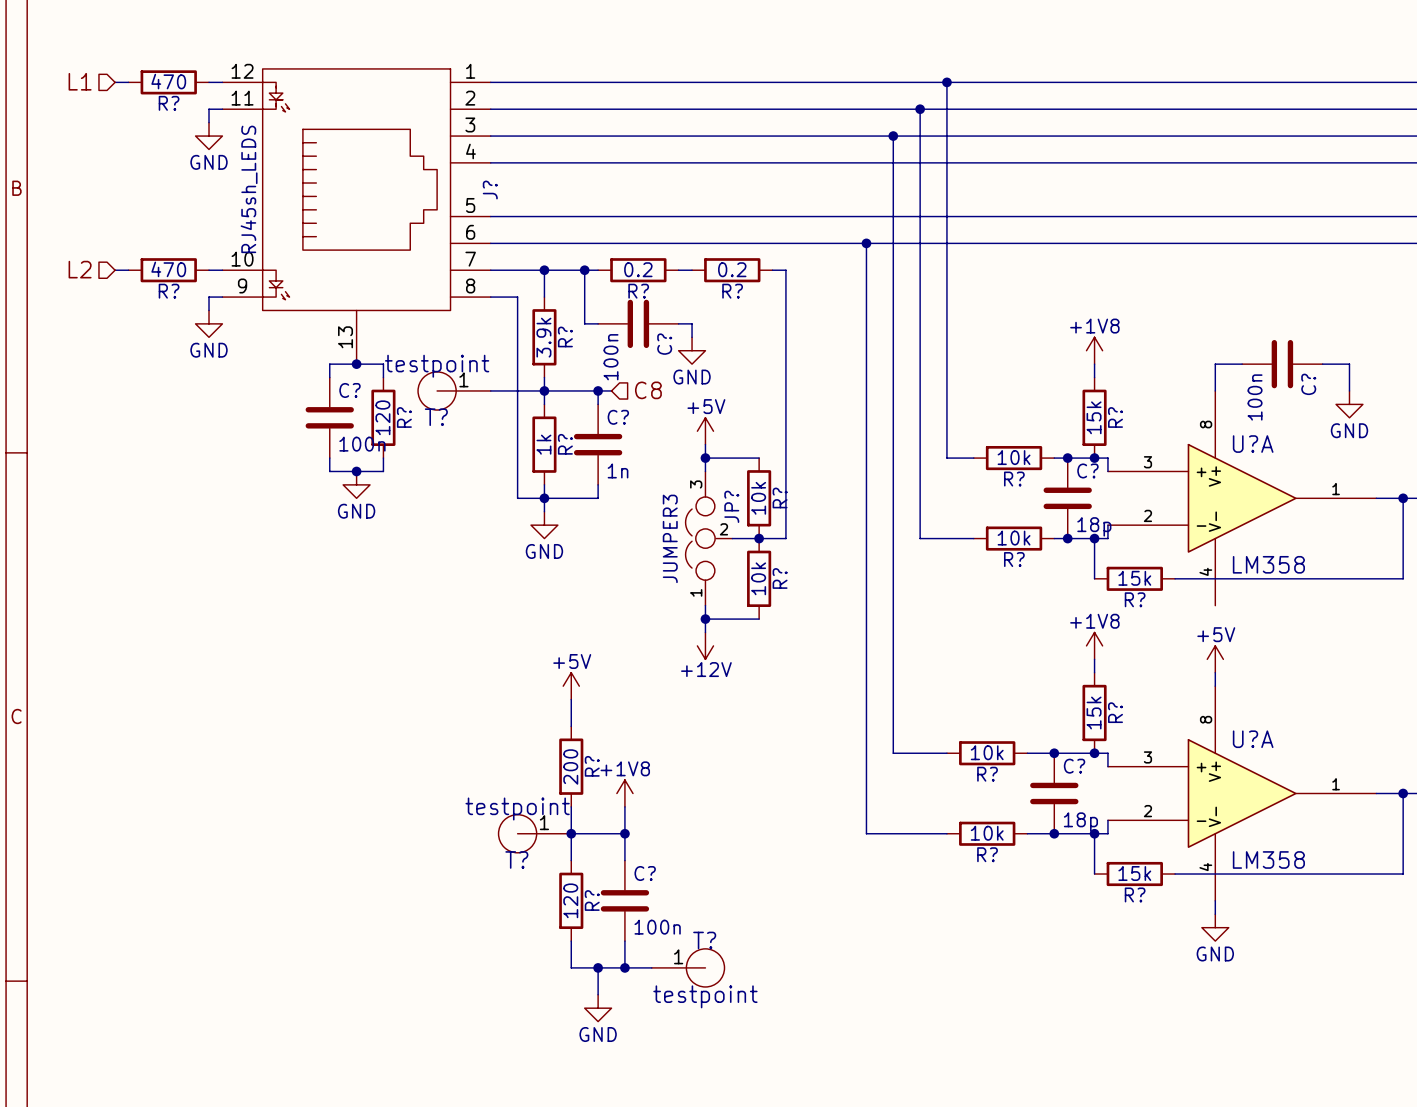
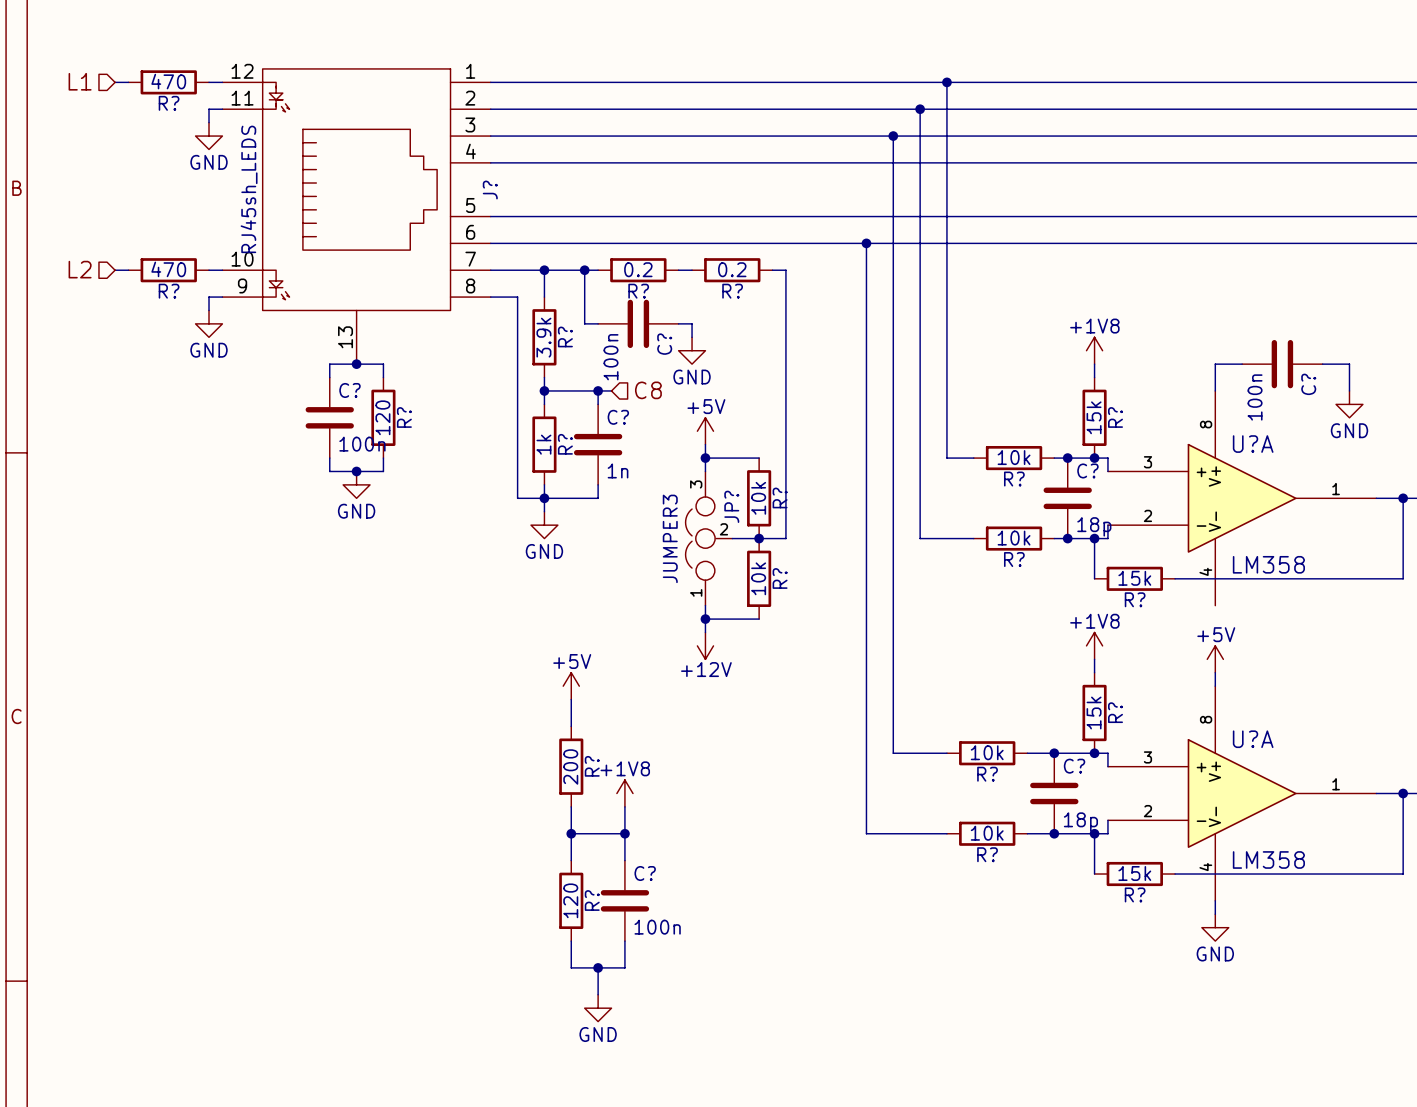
T?: testpoint (454, 390) -> none
wire: (490, 390) (544, 390) -> none
T?: testpoint (534, 833) -> none
wire: (624, 967) (651, 967) -> none
junction: (624, 967) -> none
T?: testpoint (688, 967) -> none

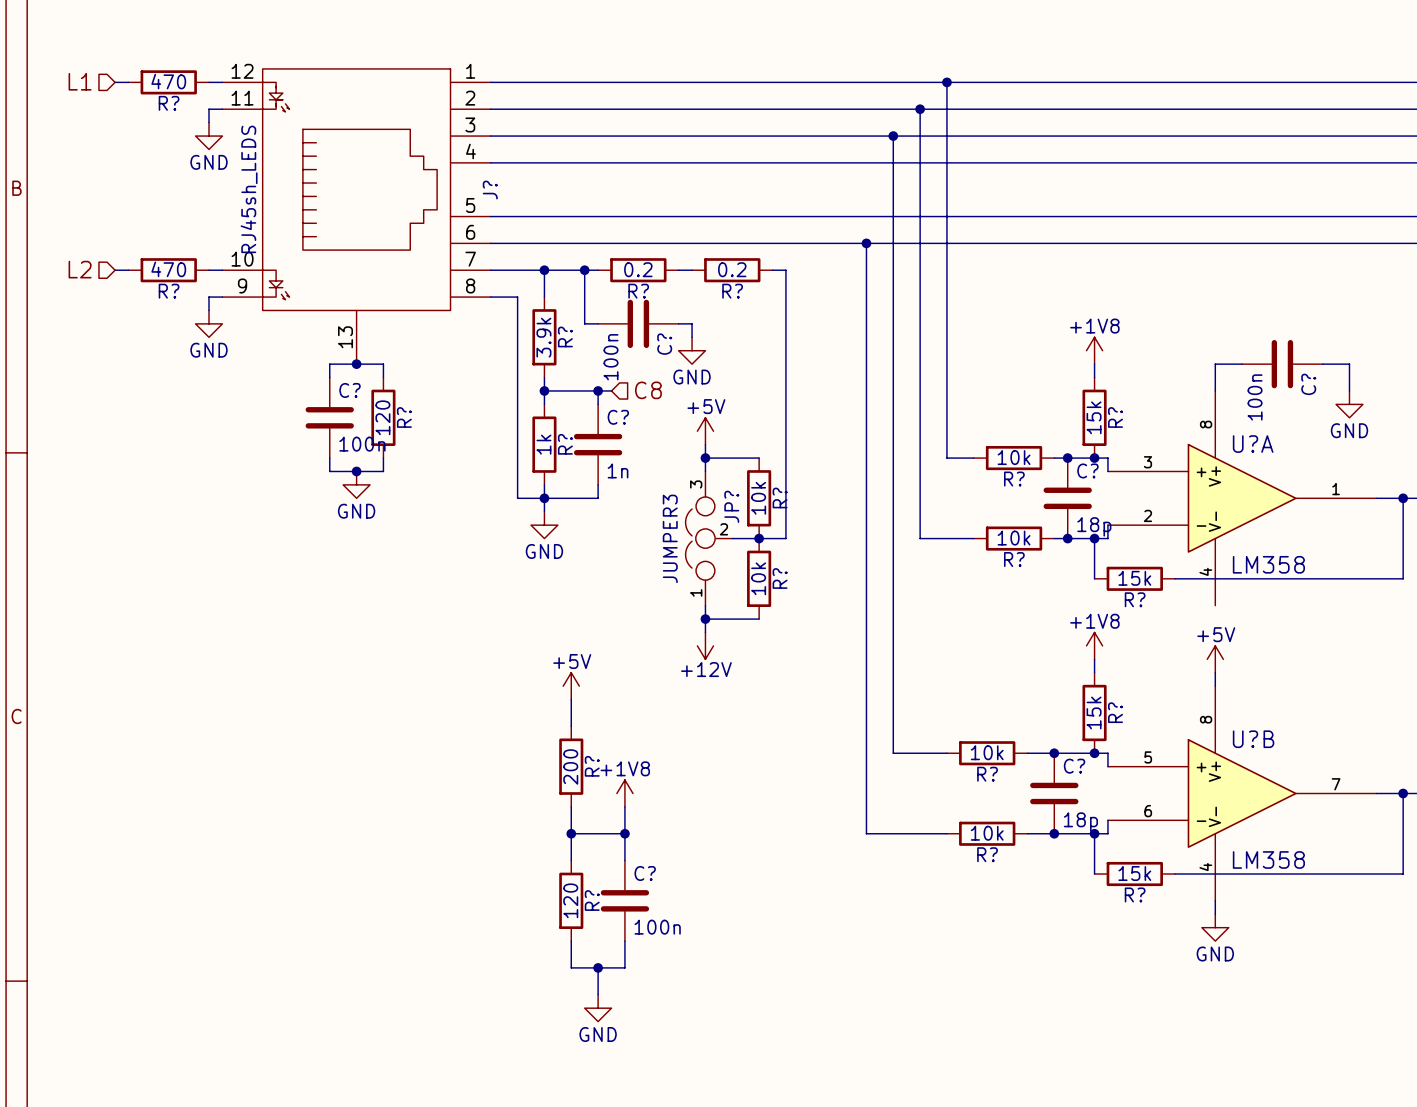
U?A name: U?A (1253, 739) -> U?B (1253, 739)
U?A pin number: 3 (1147, 757) -> 5 (1148, 757)
U?A pin number: 1 (1336, 784) -> 7 (1336, 784)
U?A pin number: 2 (1147, 811) -> 6 (1148, 811)

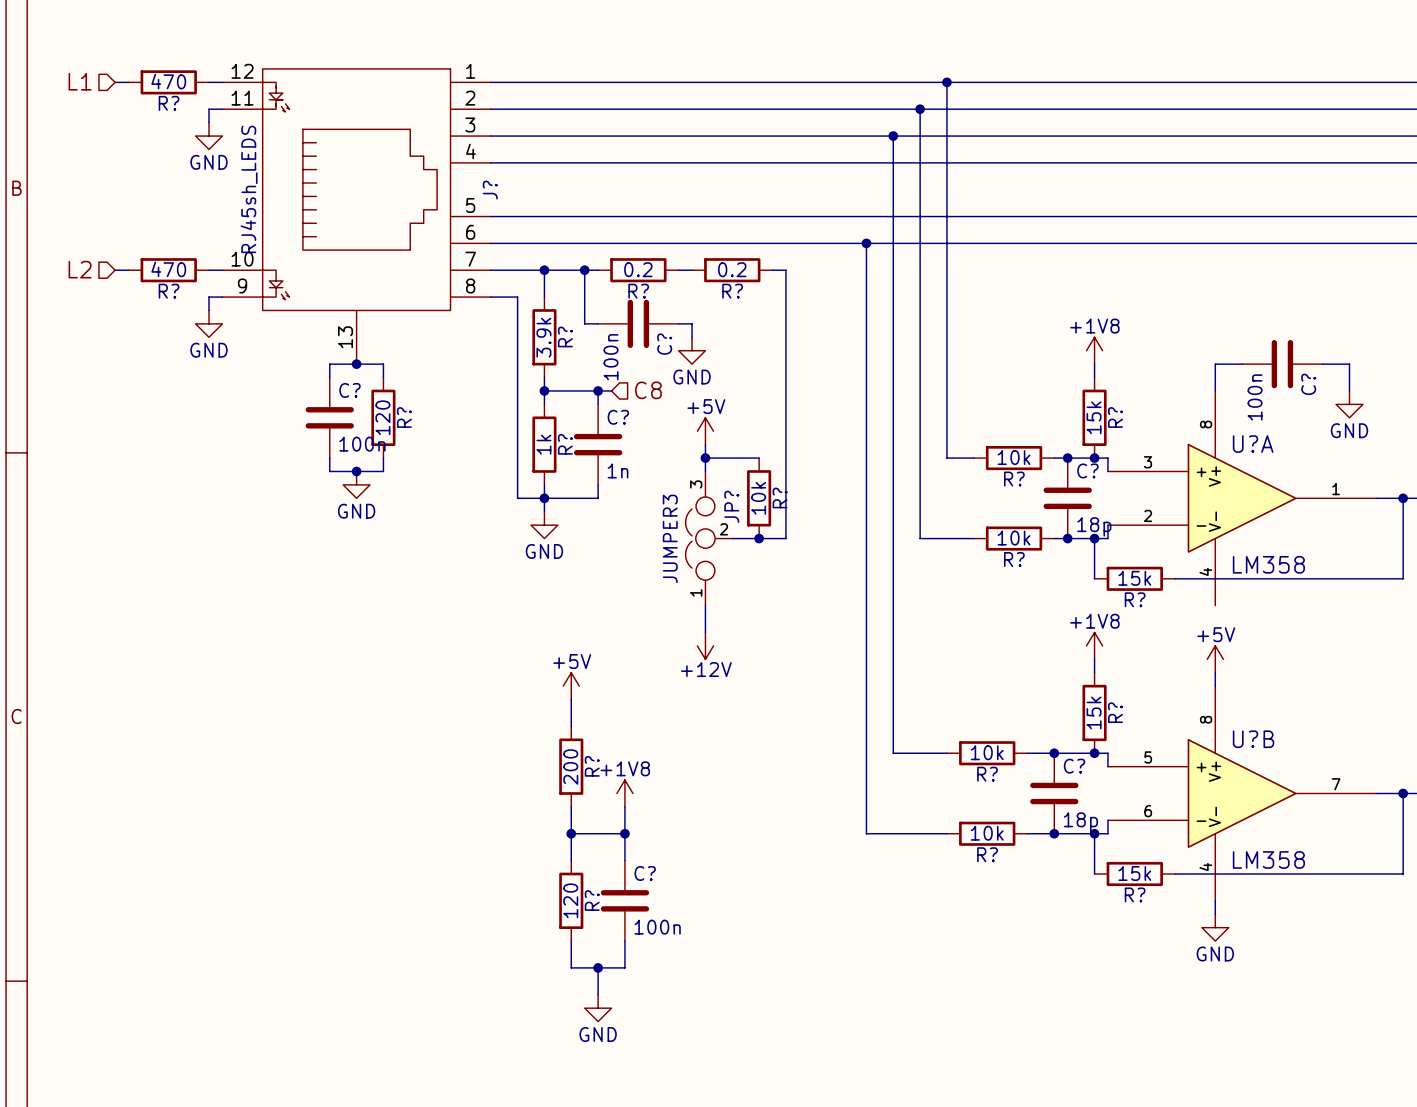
R?: 10k (759, 578) -> none
wire: (705, 619) (759, 619) -> none
junction: (705, 619) -> none

